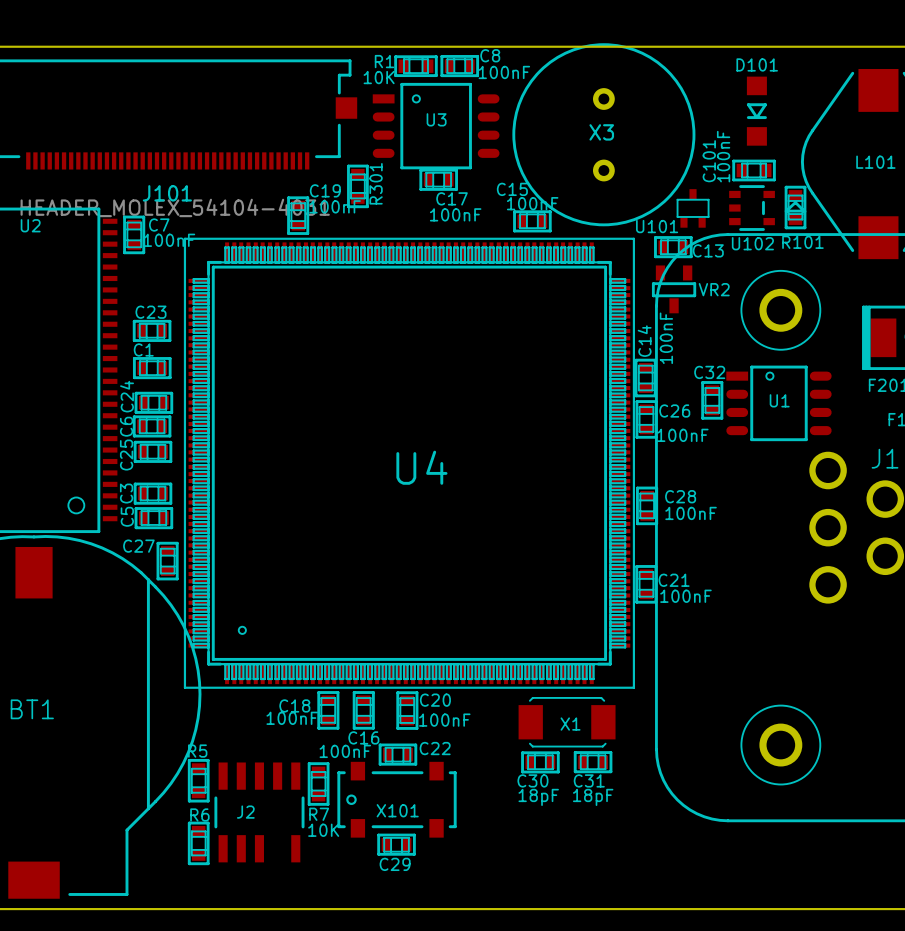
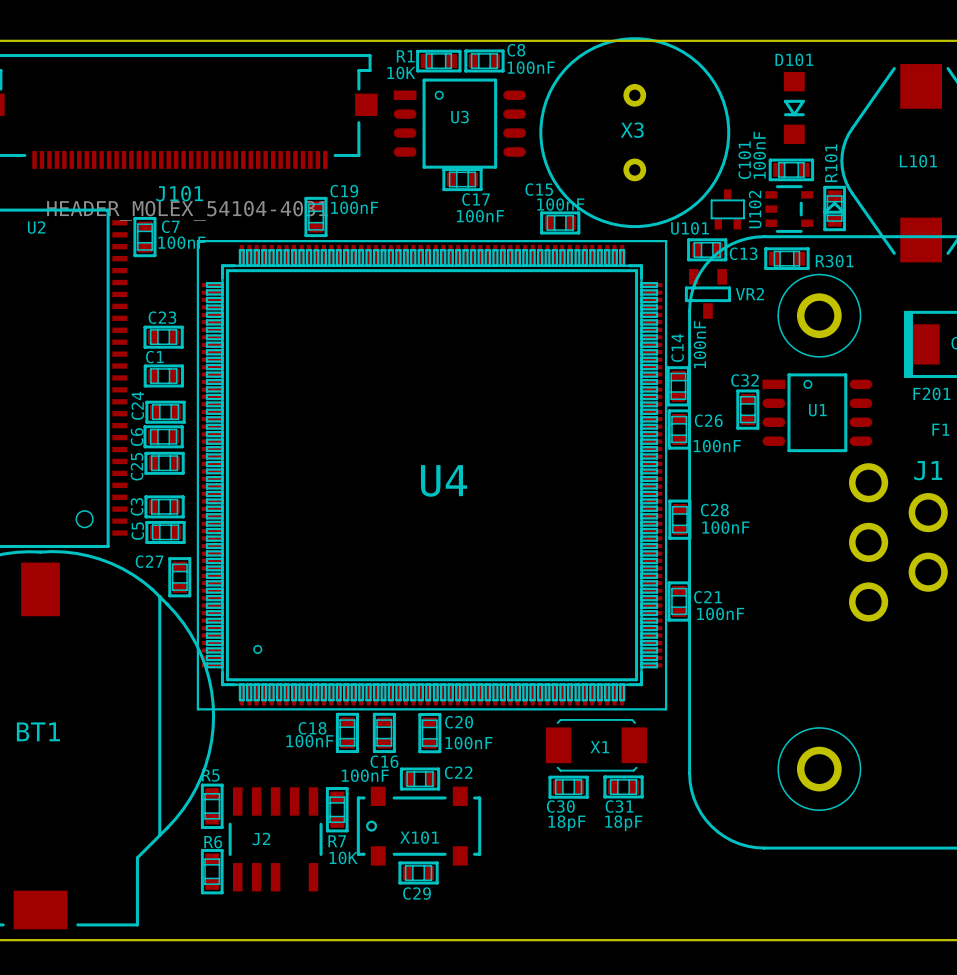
R301 rotation: 0° (357, 186) -> 90° clockwise (786, 258)
R301 position: (357, 186) -> (786, 258)
R101 name rotation: 0° (802, 242) -> 90° counterclockwise (831, 163)
R101 name position: R101 (802, 242) -> R101 (831, 163)
U102 name rotation: 0° (752, 243) -> 90° counterclockwise (755, 209)

